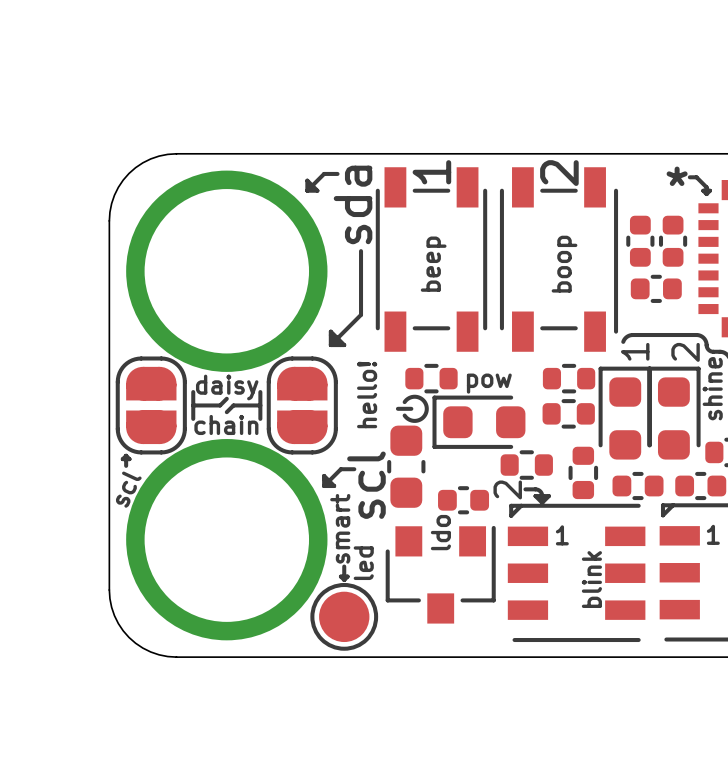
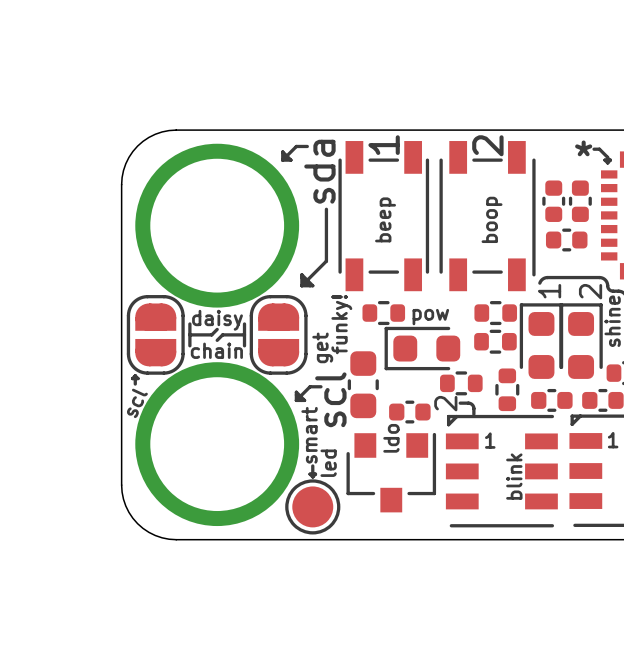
text: hello! (367, 395) -> funky! (341, 324)
line: (404, 402) (410, 397) (418, 397) (424, 401) (426, 408) (424, 416) (418, 420) (410, 420) (404, 415) -> none
line: (397, 408) (411, 408) -> none
text: none -> get (322, 347)
line: (535, 496) (548, 496) (542, 502) (535, 496) -> none

